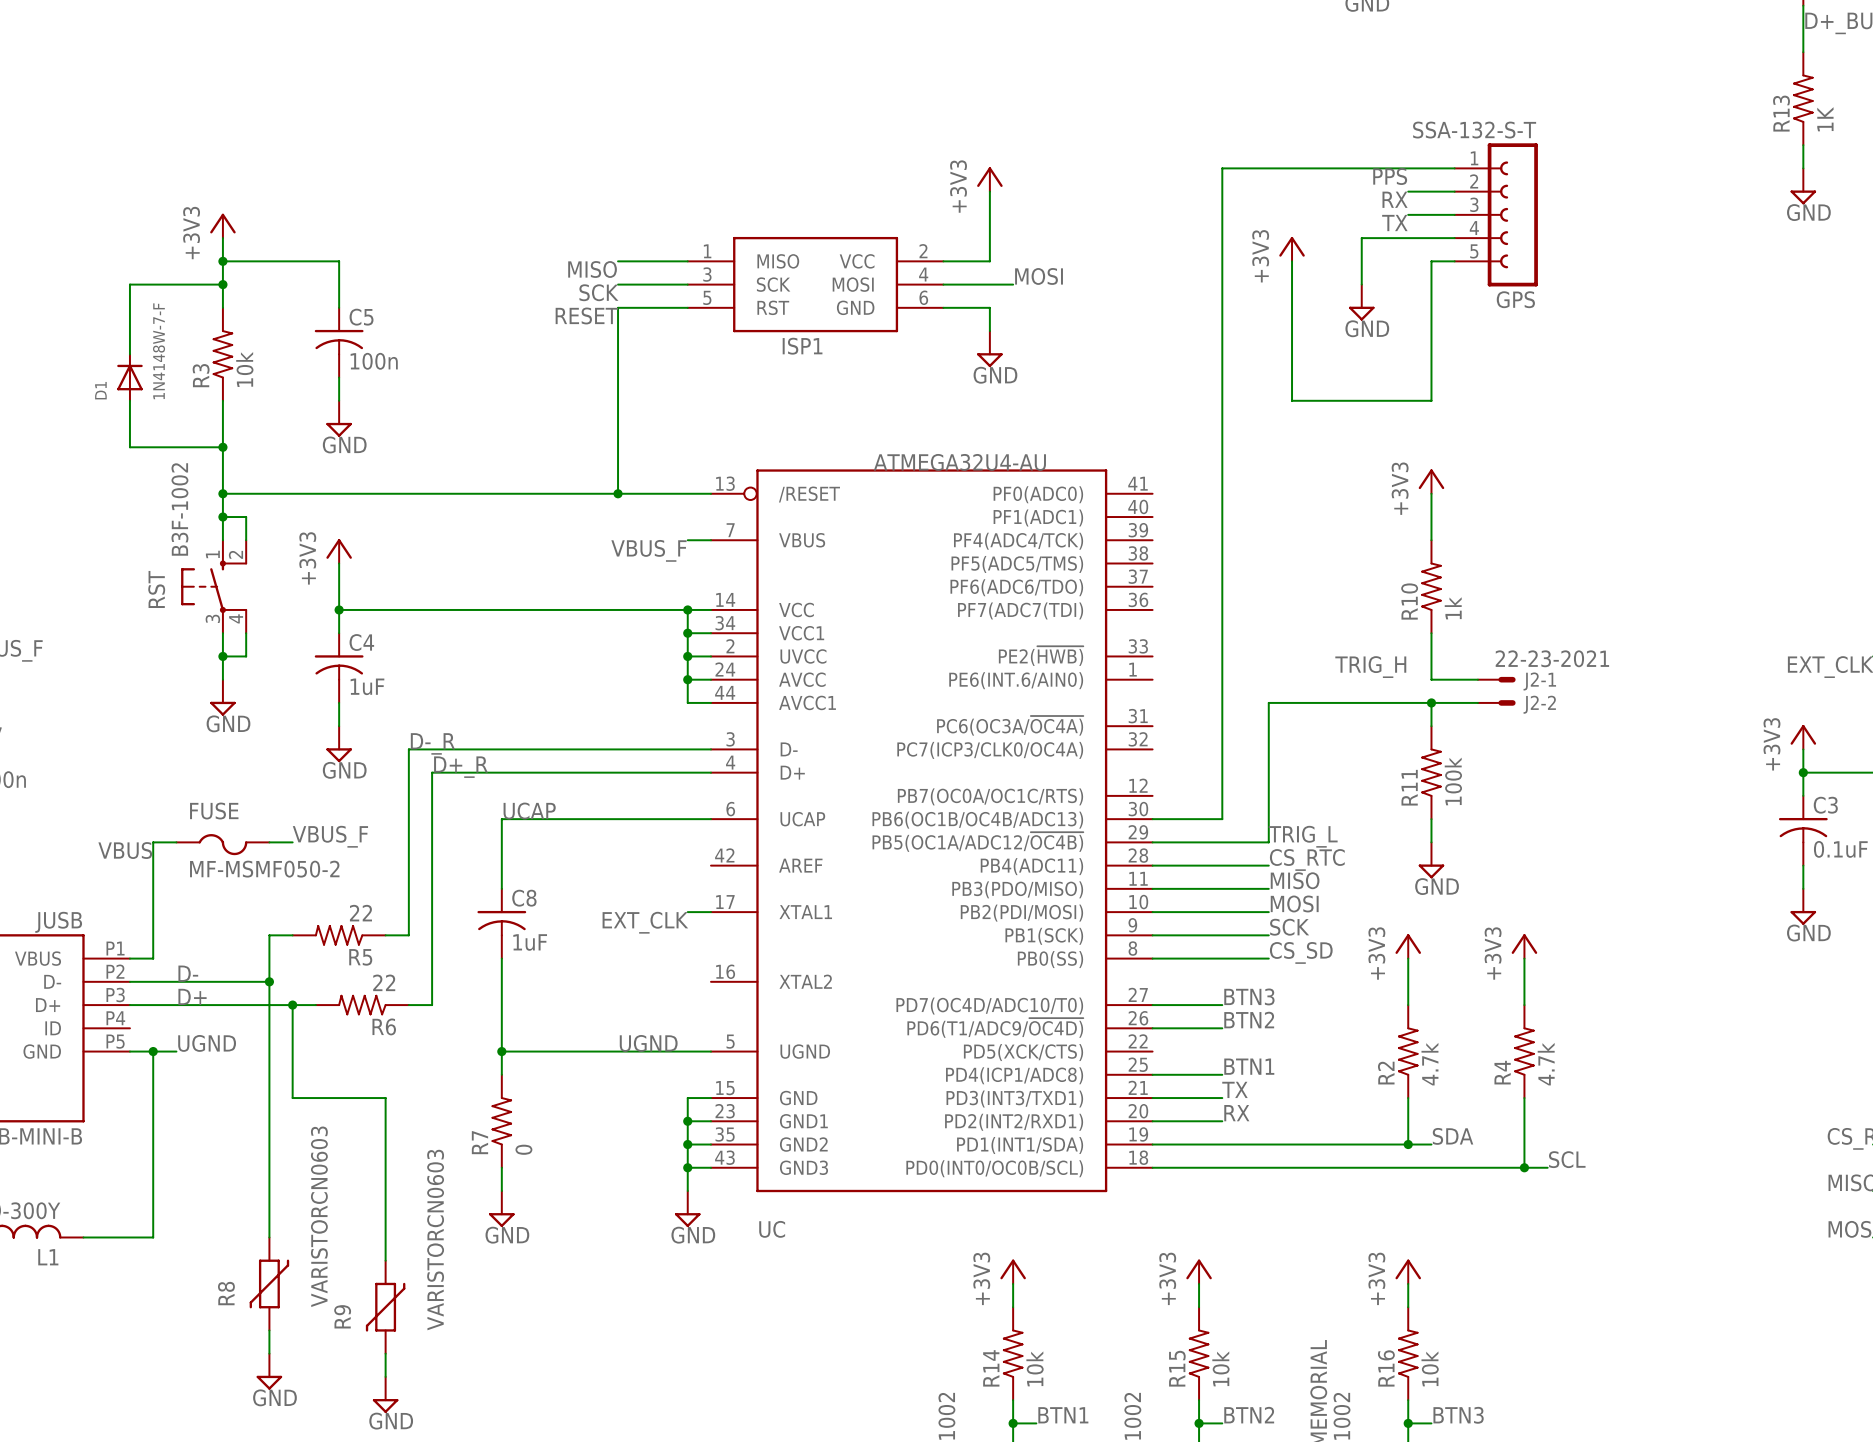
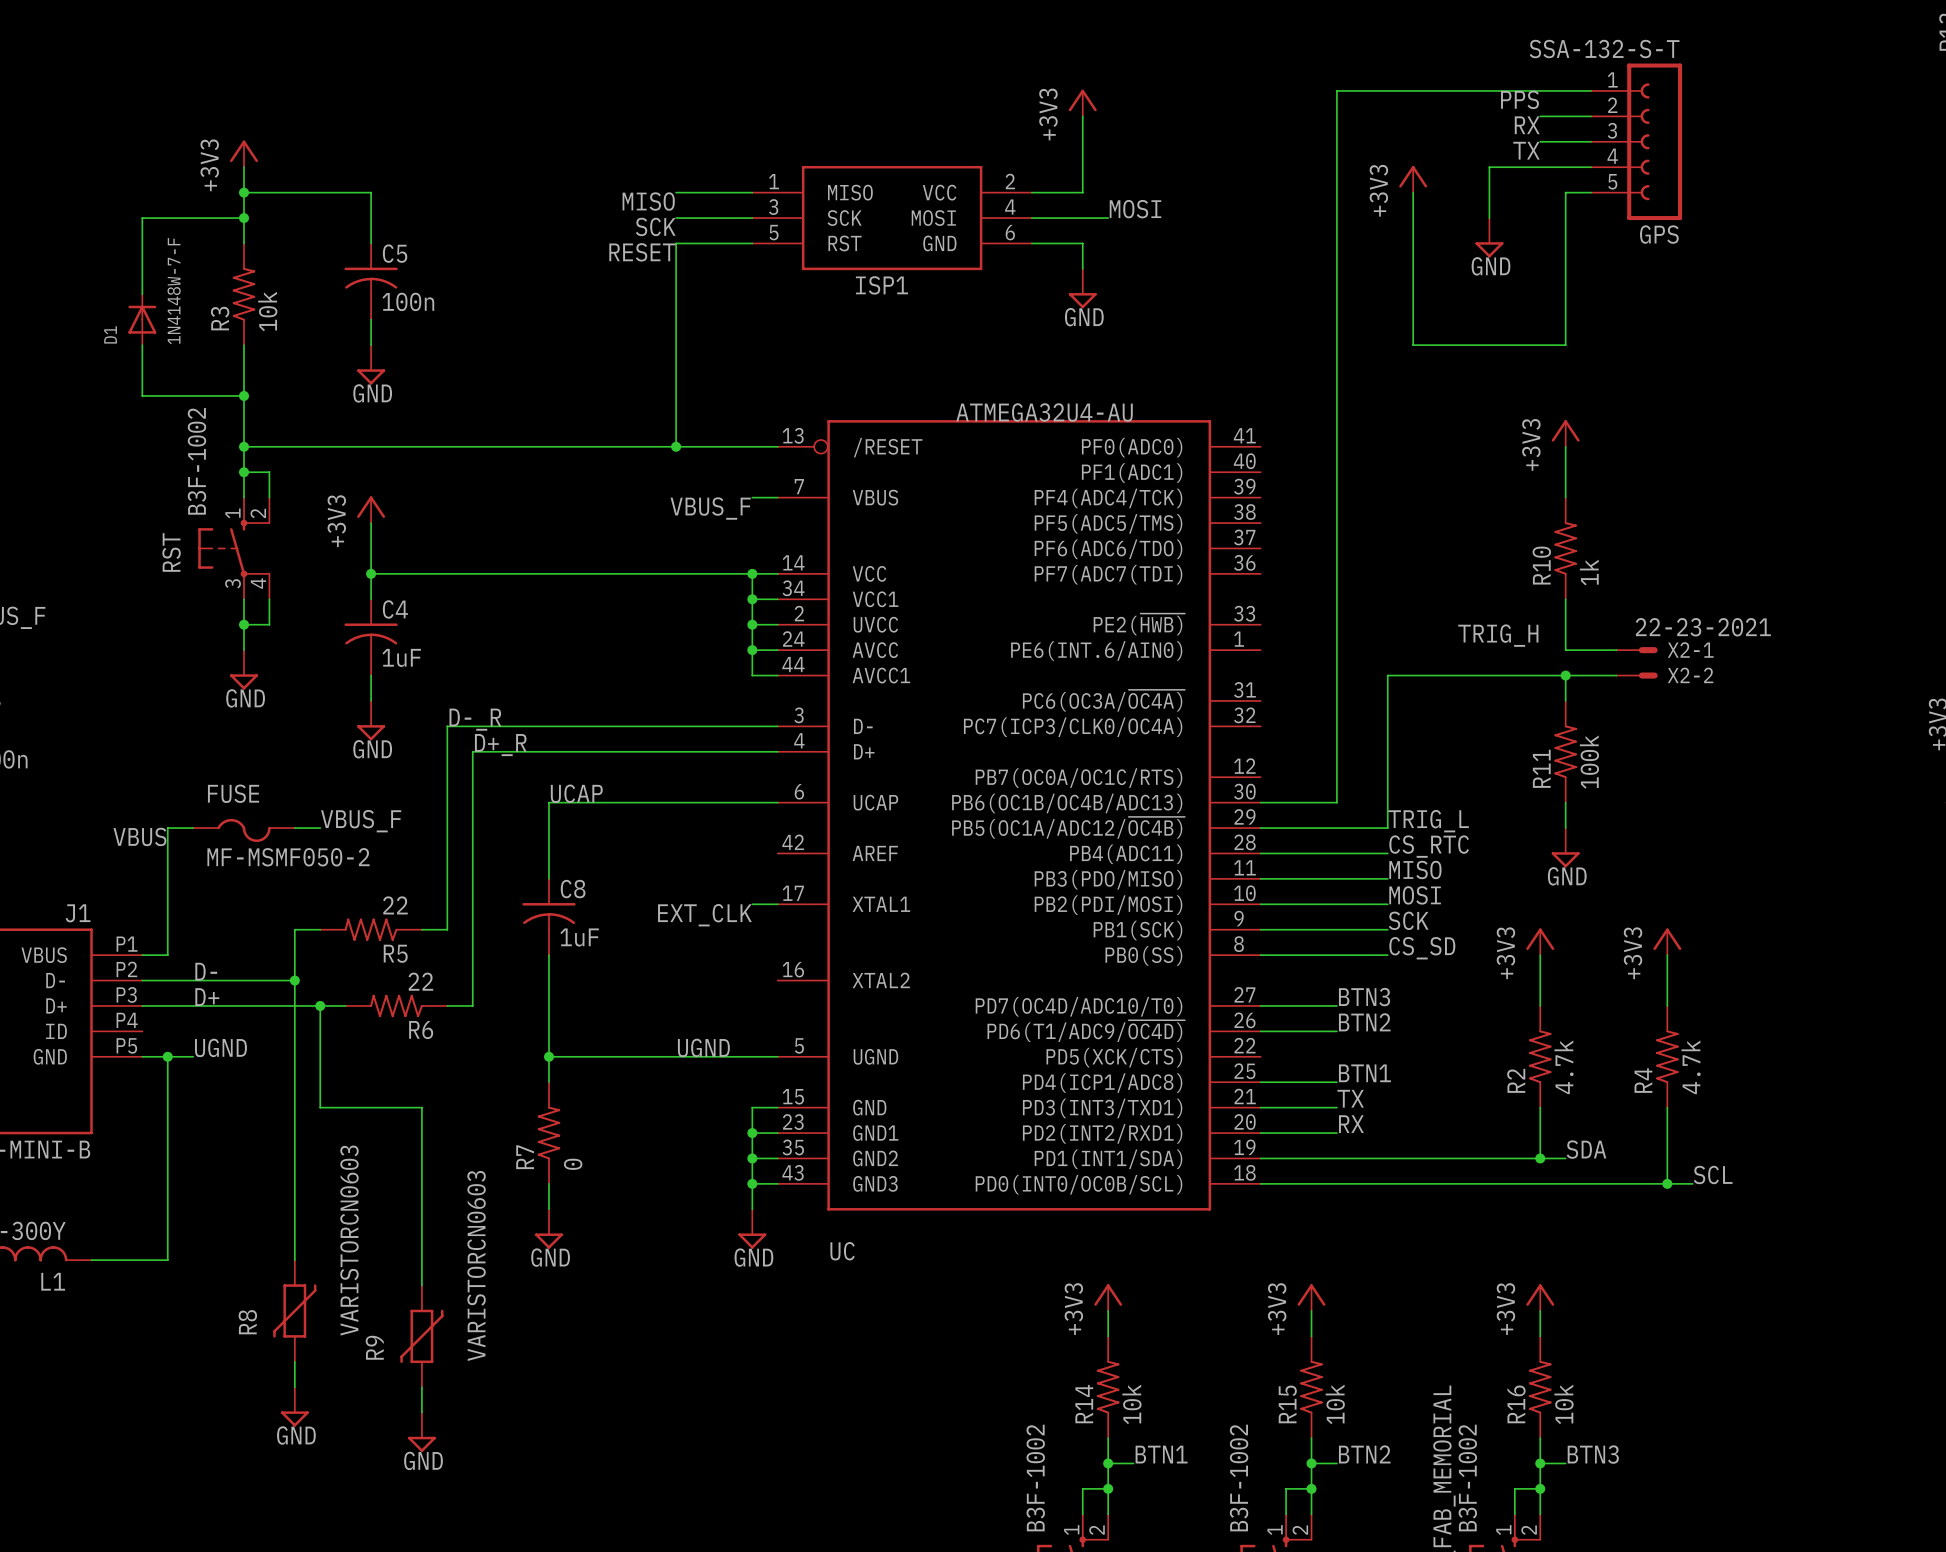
J2-1 name: J2-1 (1539, 681) -> X2-1 (1690, 650)
J2-2 name: J2-2 (1539, 704) -> X2-2 (1690, 675)
JUSB name: JUSB (58, 922) -> J1 (78, 913)

